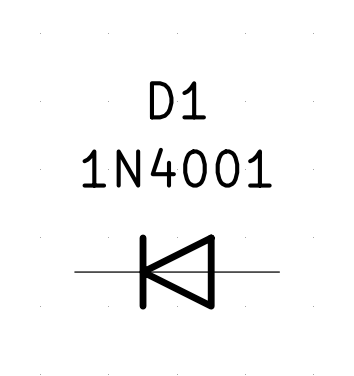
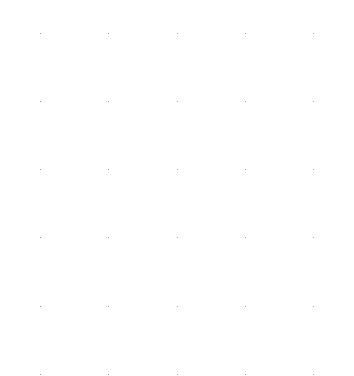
D1: 1N4001 (177, 272) -> none

